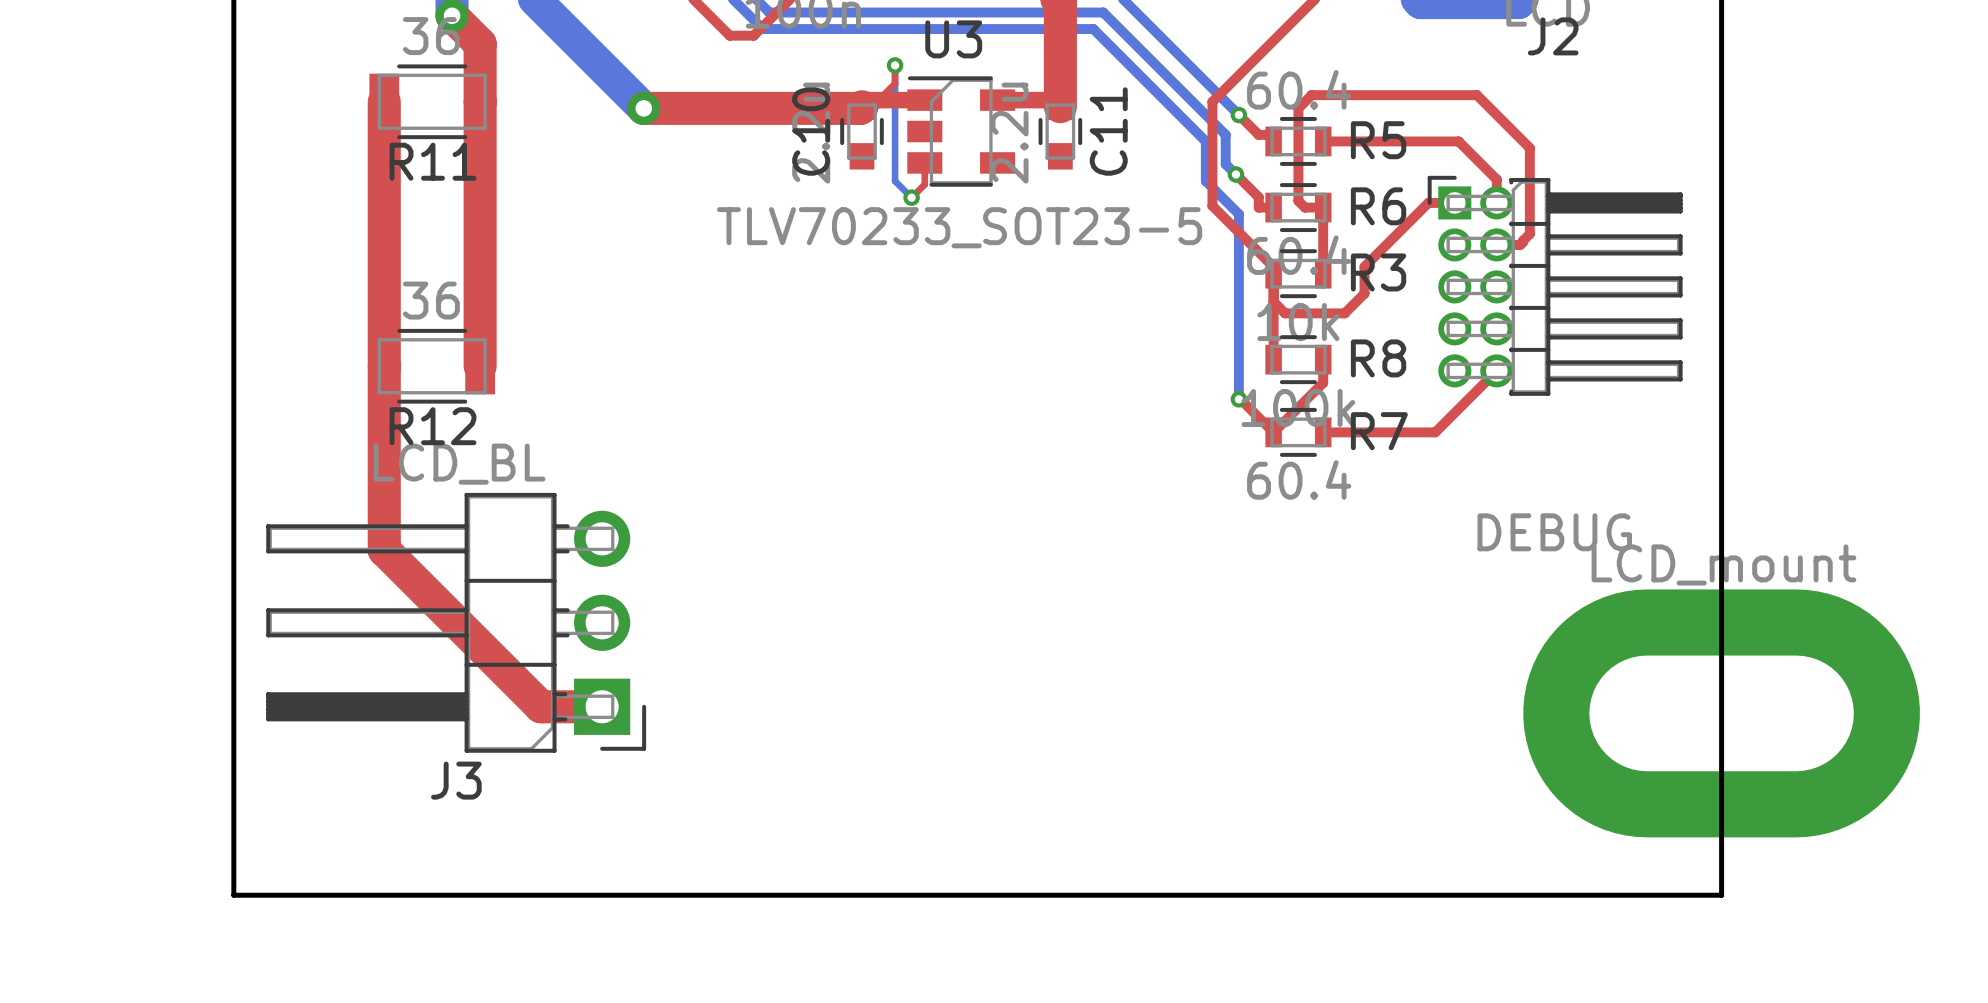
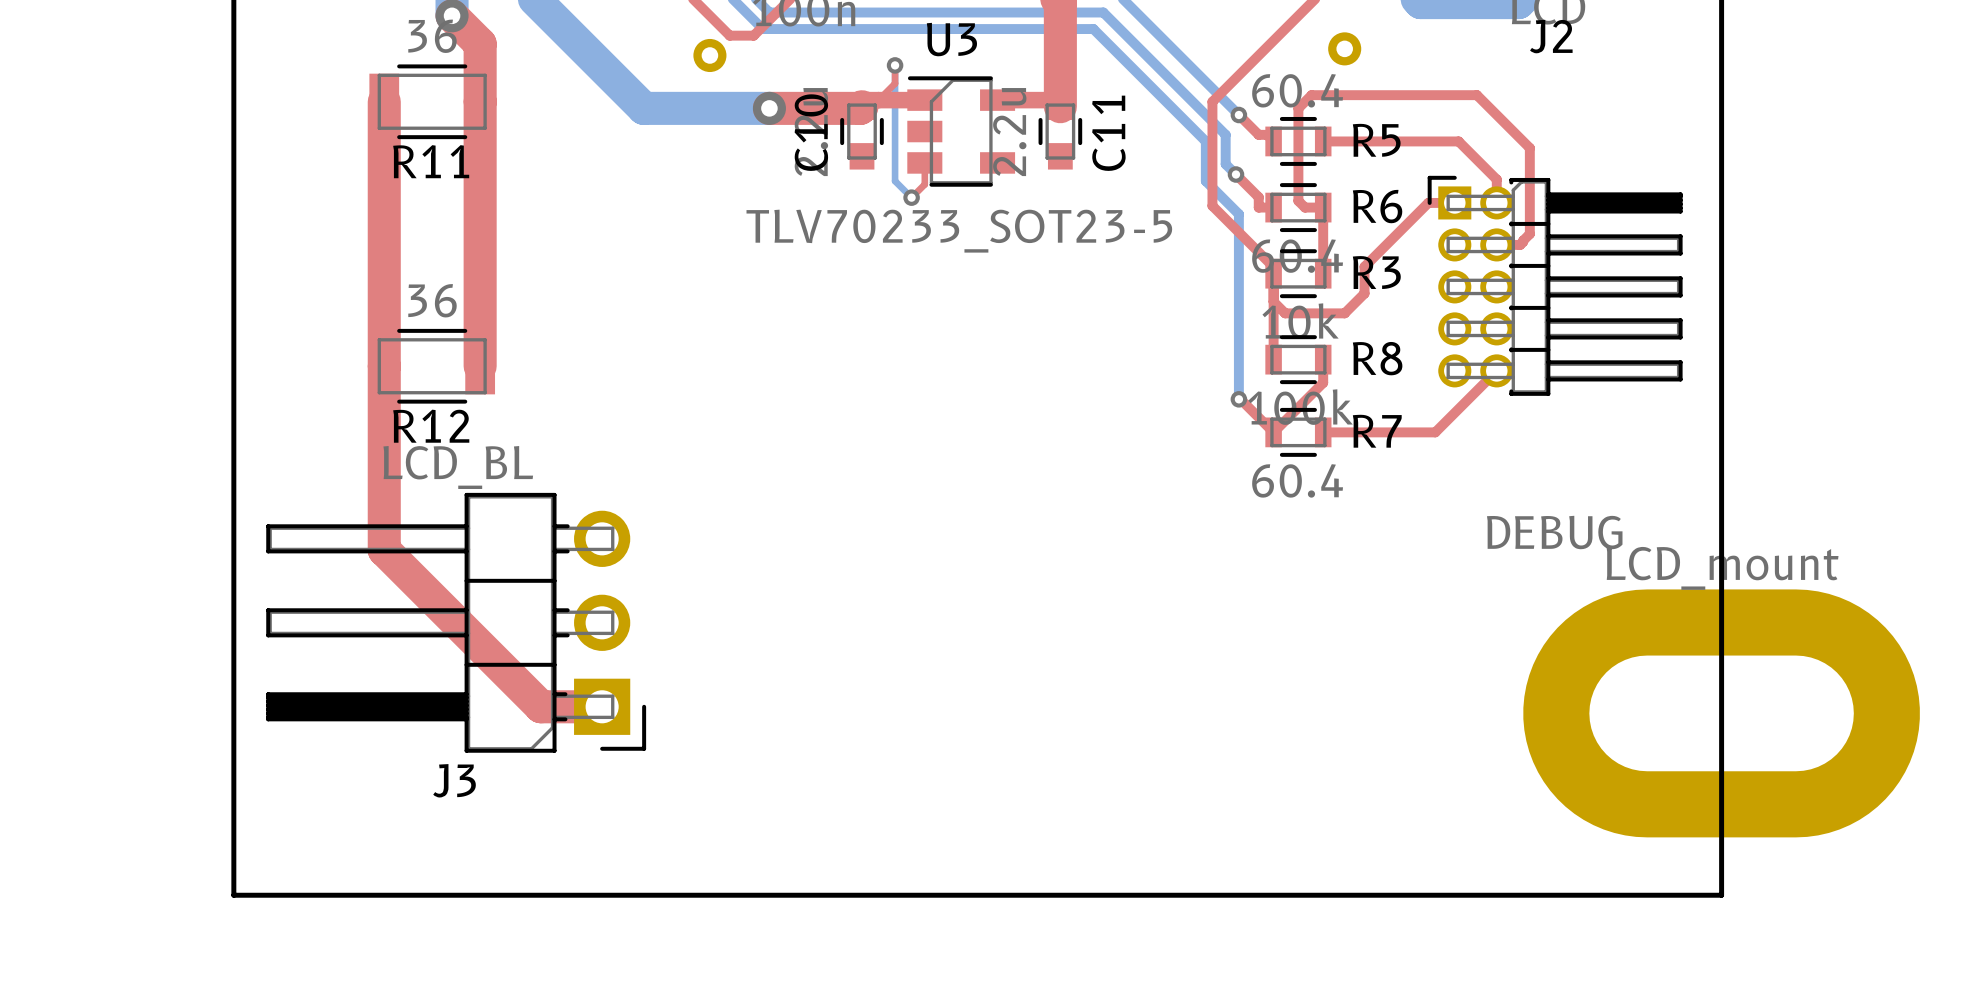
part: none -> (1344, 48)
part: none -> (709, 55)
top track: (643, 108) (769, 108) -> none
bottom track: none -> (643, 108) (769, 108)
via position: (643, 108) -> (769, 108)

